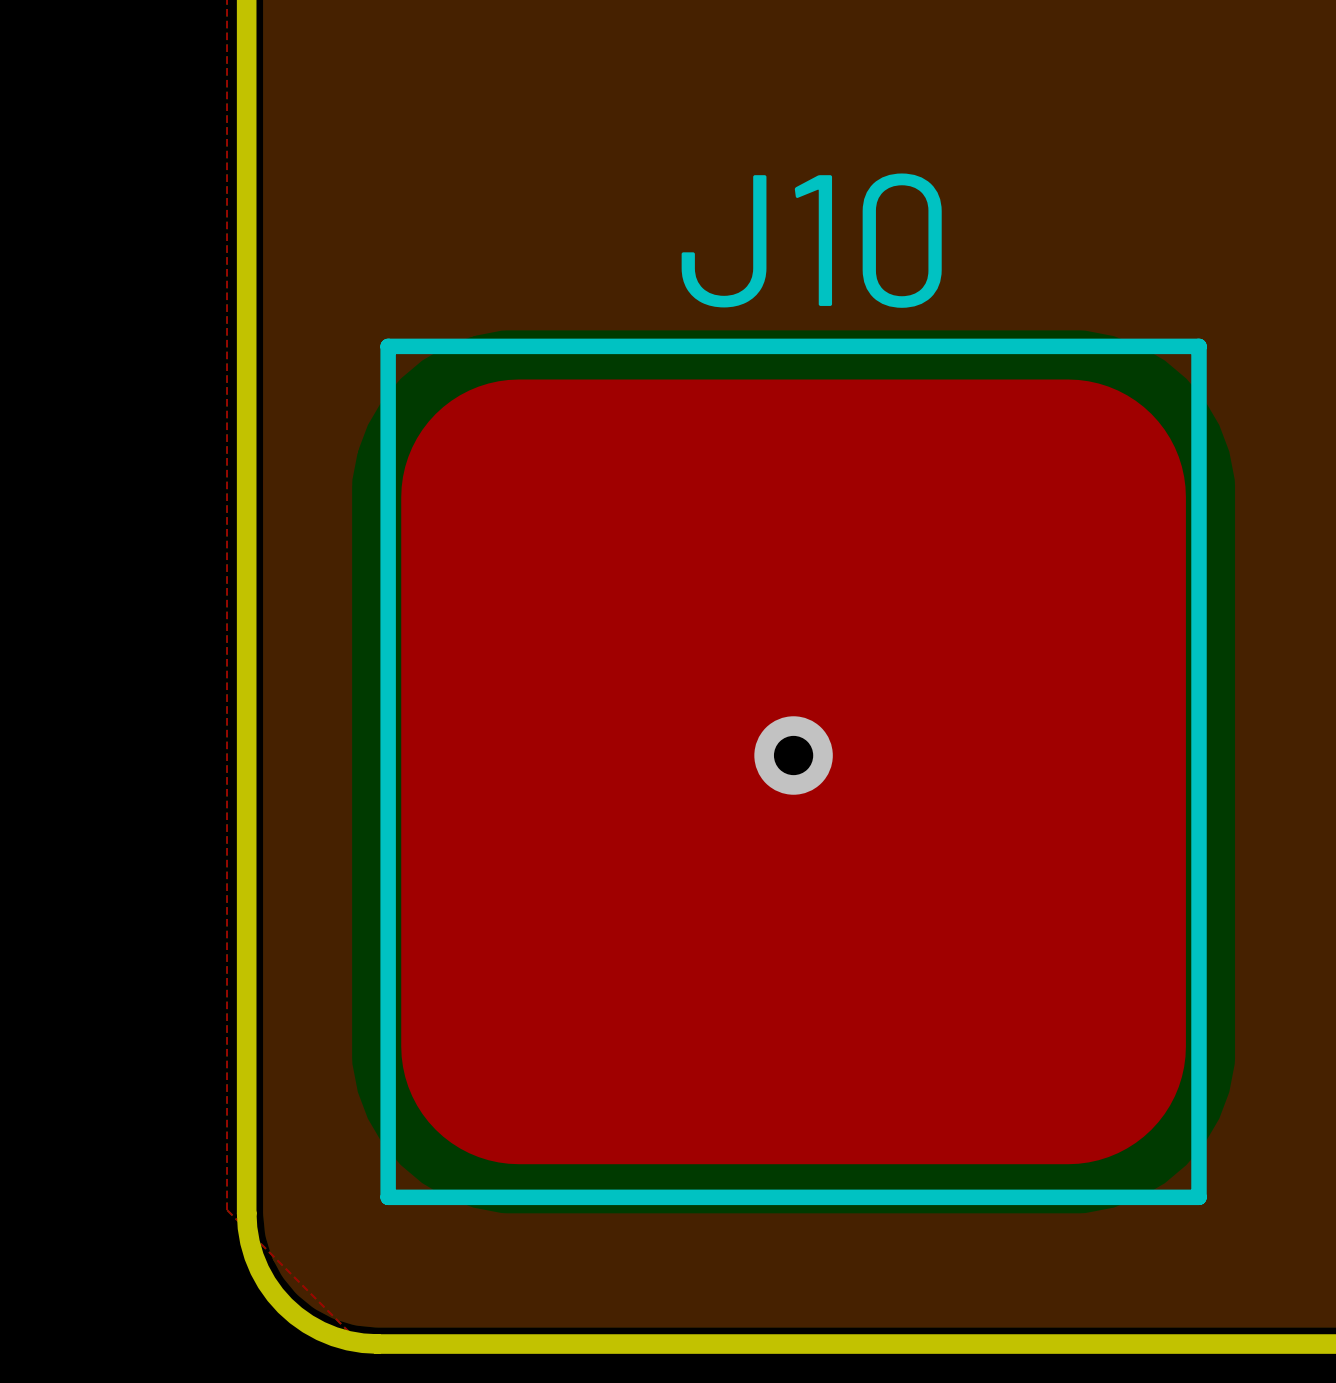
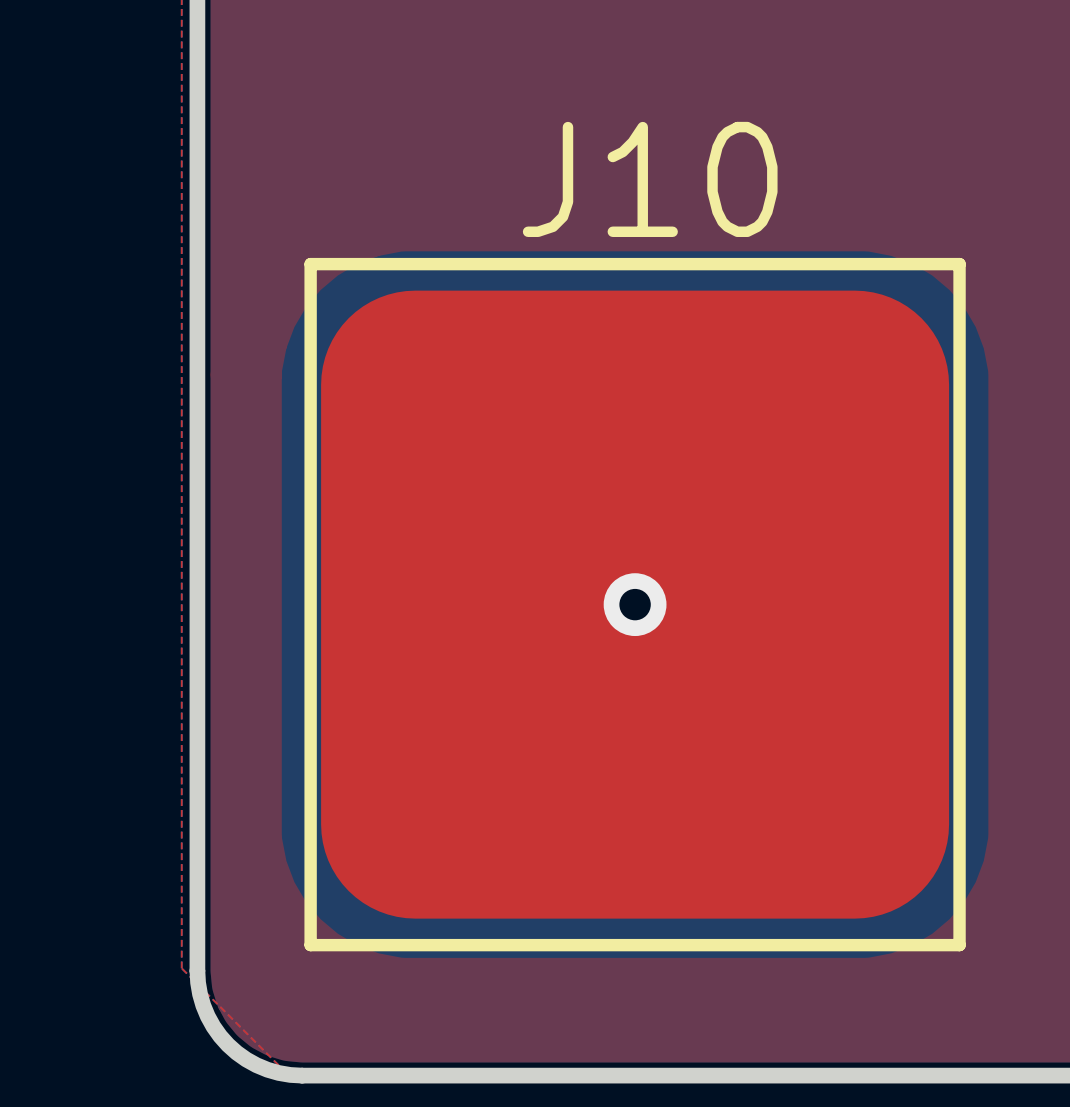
J10 position: (793, 771) -> (635, 604)

